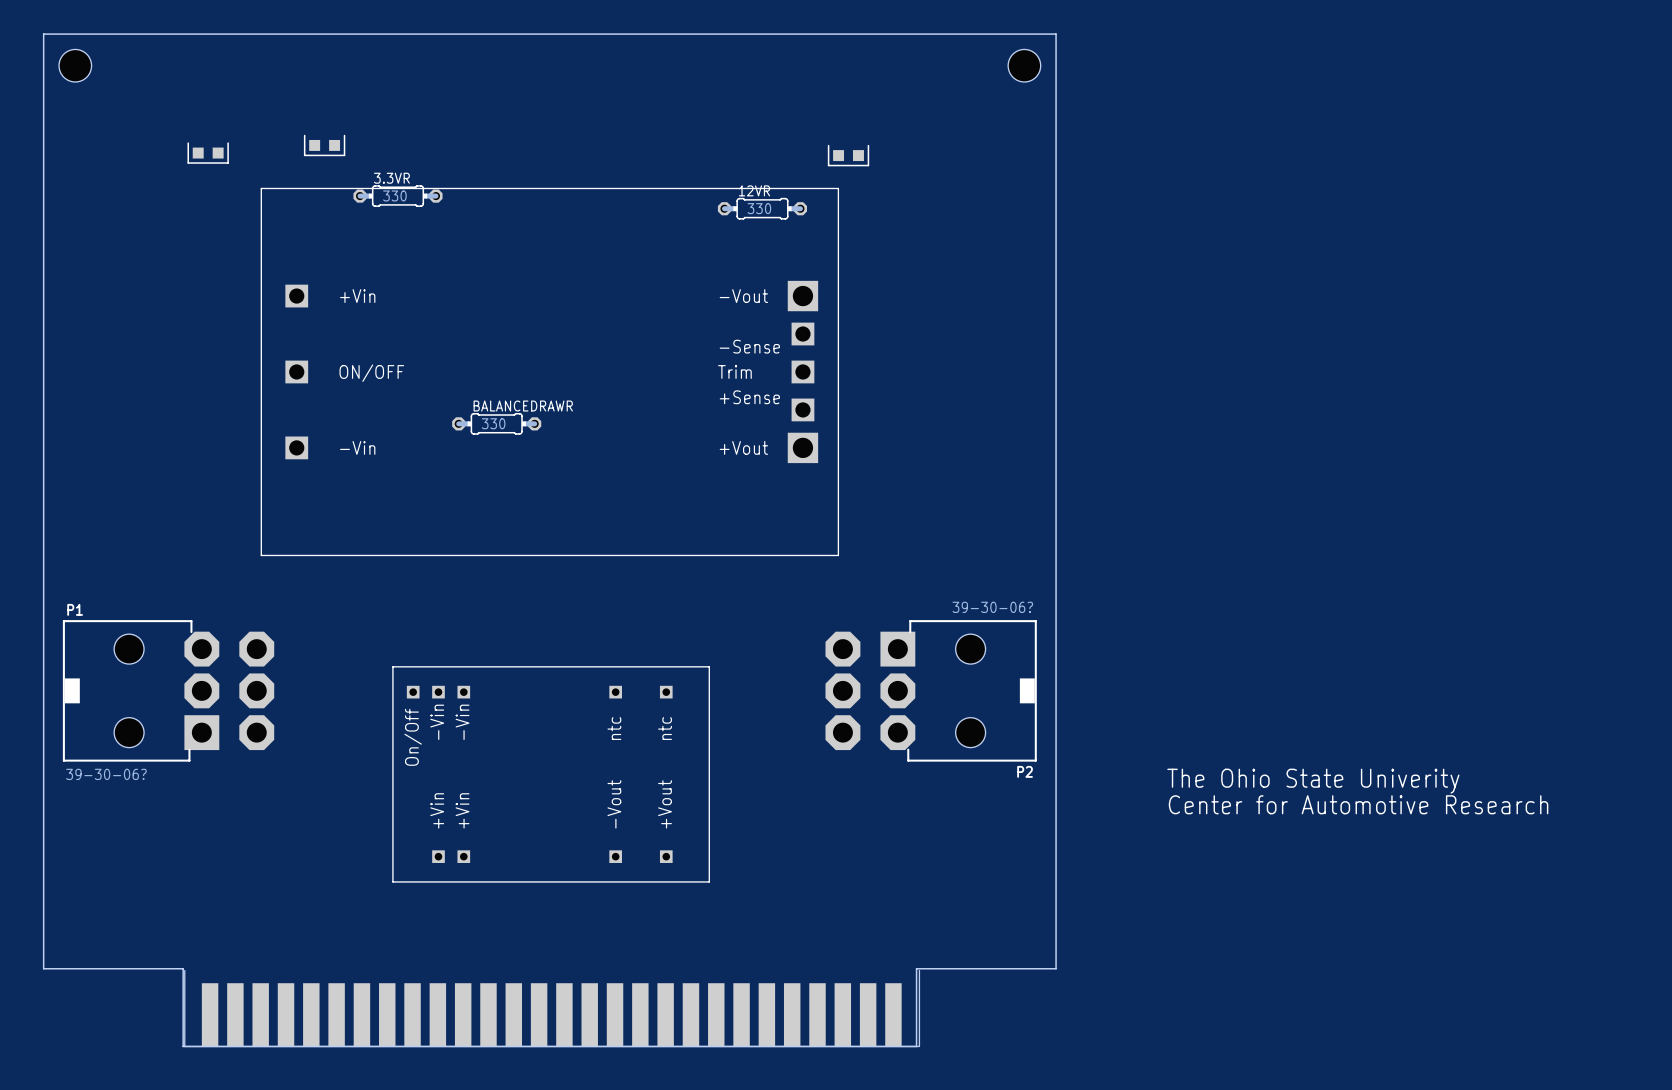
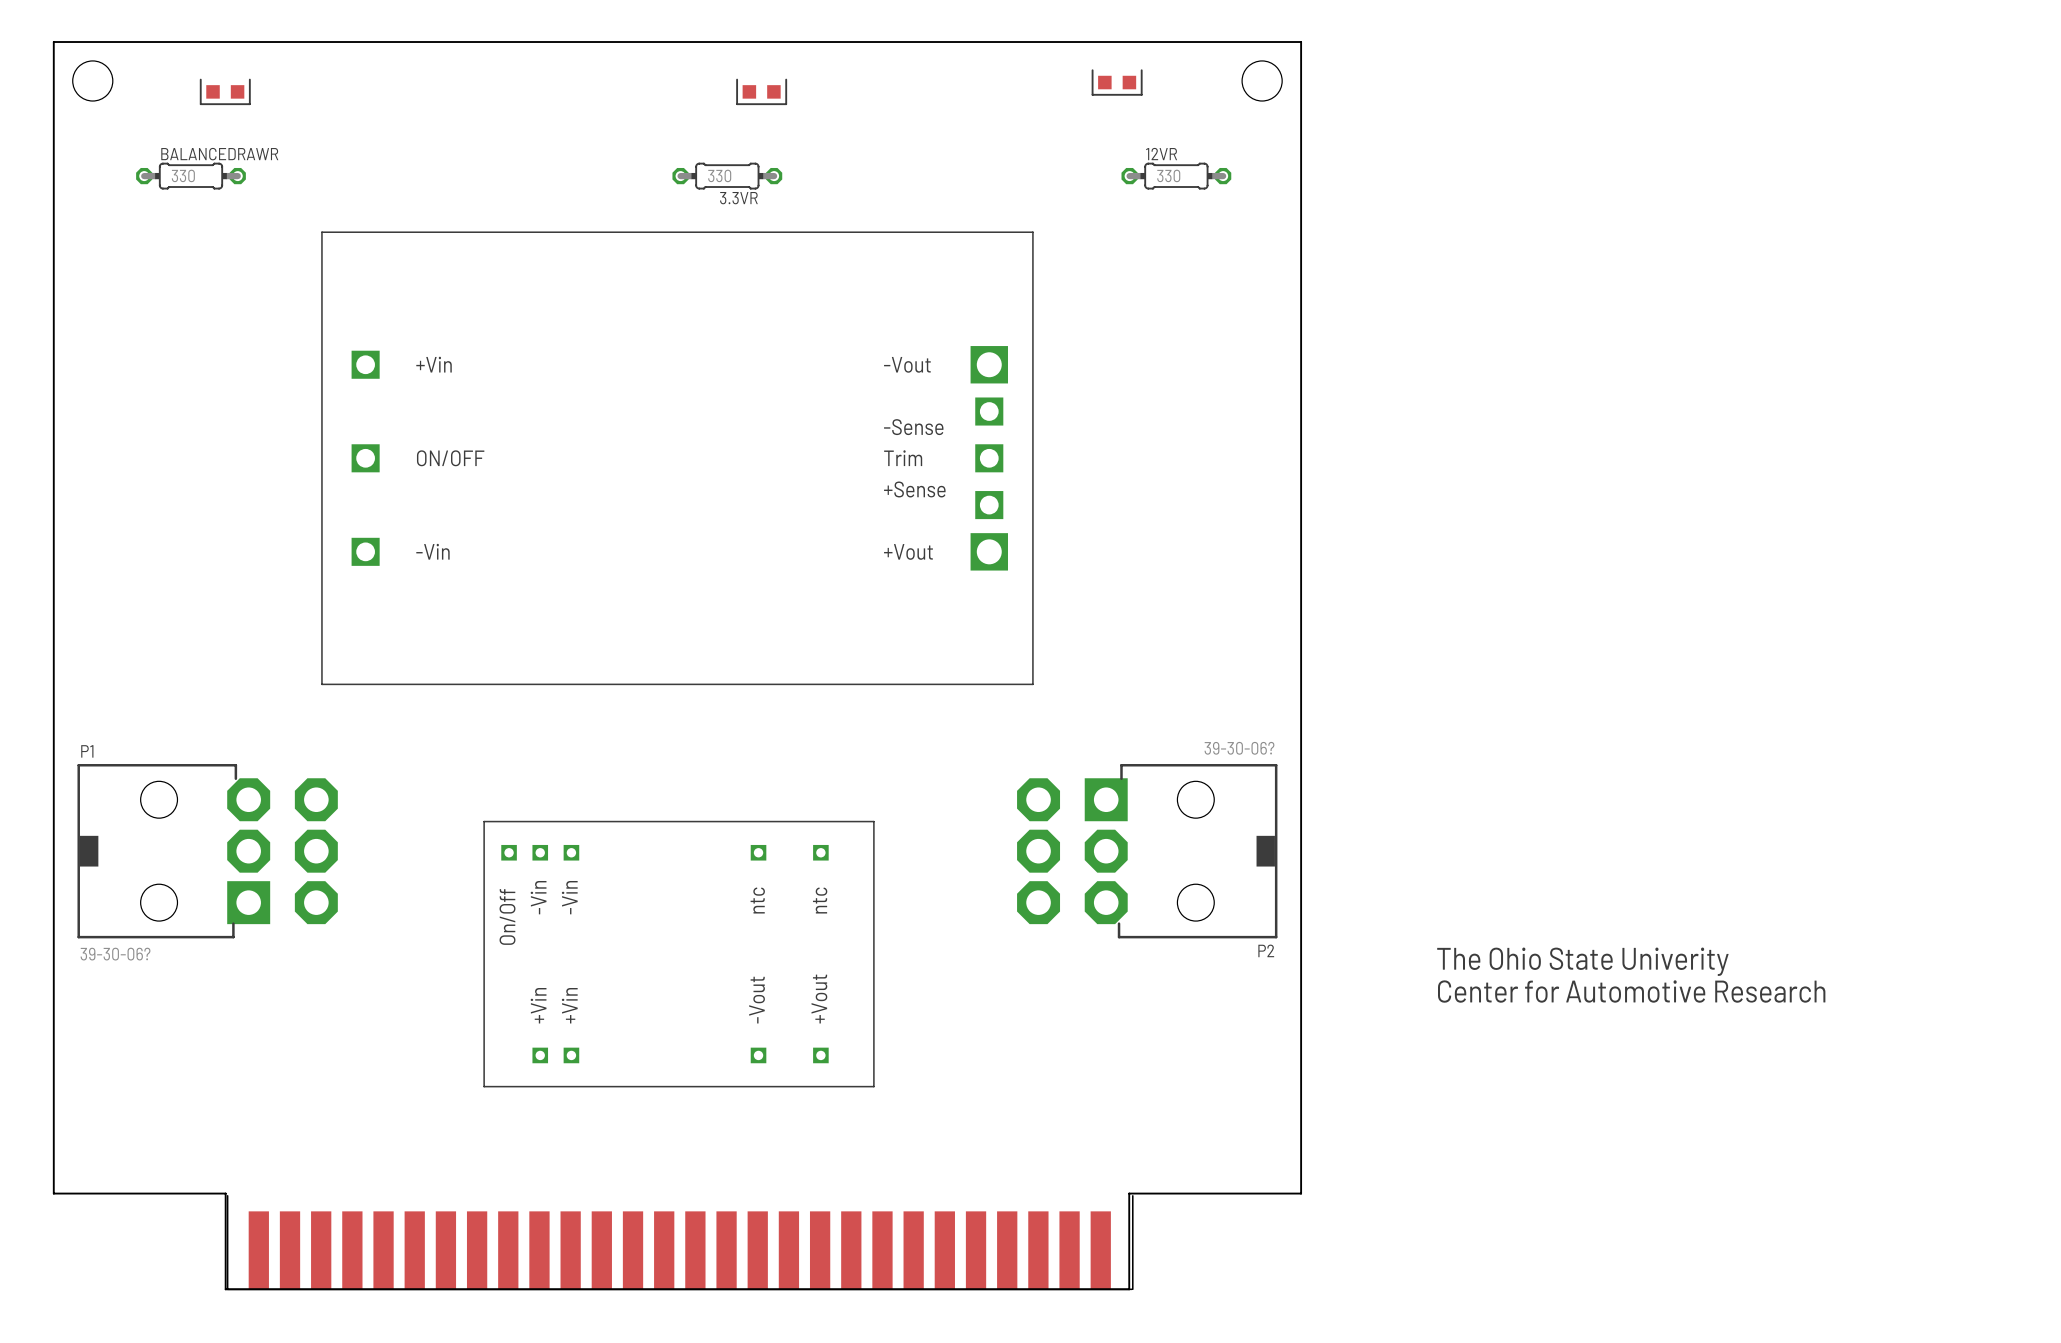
part: none -> (225, 91)
part: none -> (761, 91)
BALANCEDRAWR: none -> 330 (190, 176)
part: (324, 145) -> none
part: (208, 153) -> none
part position: (848, 155) -> (1117, 82)
3.3VR name position: 3.3VR (391, 178) -> 3.3VR (738, 198)
3.3VR position: (397, 196) -> (727, 176)
12VR position: (762, 208) -> (1176, 176)
BALANCEDRAWR: 330 (496, 423) -> none

